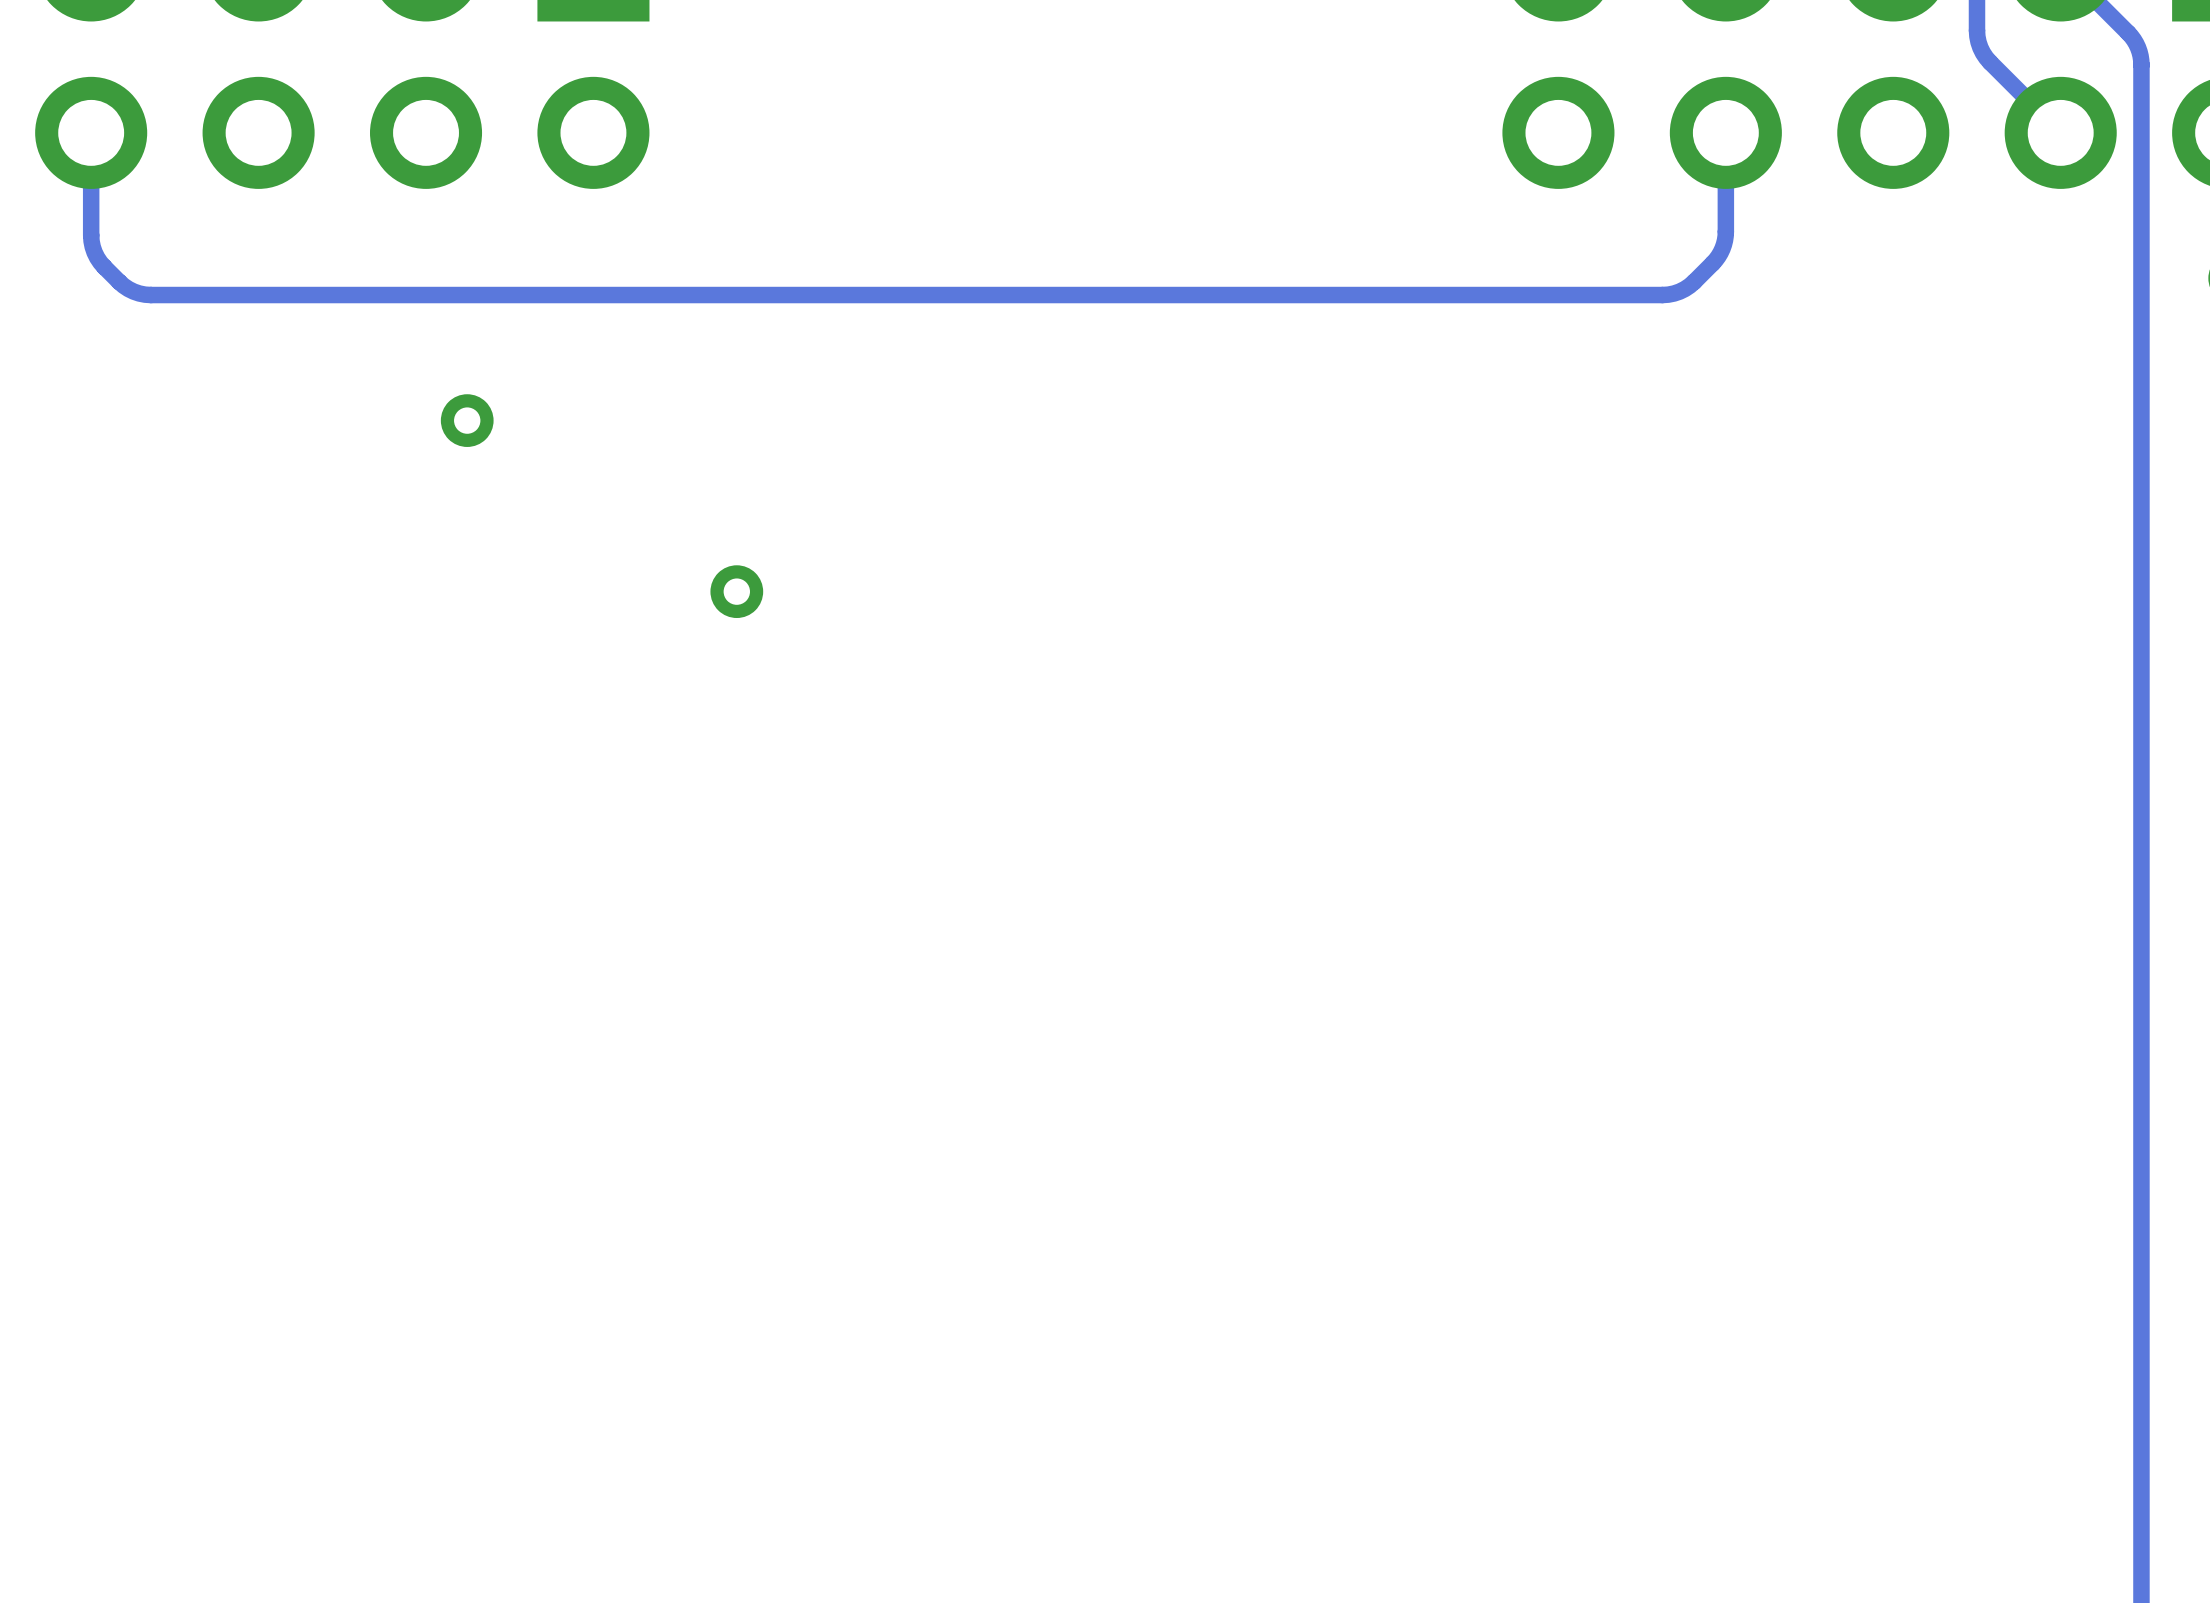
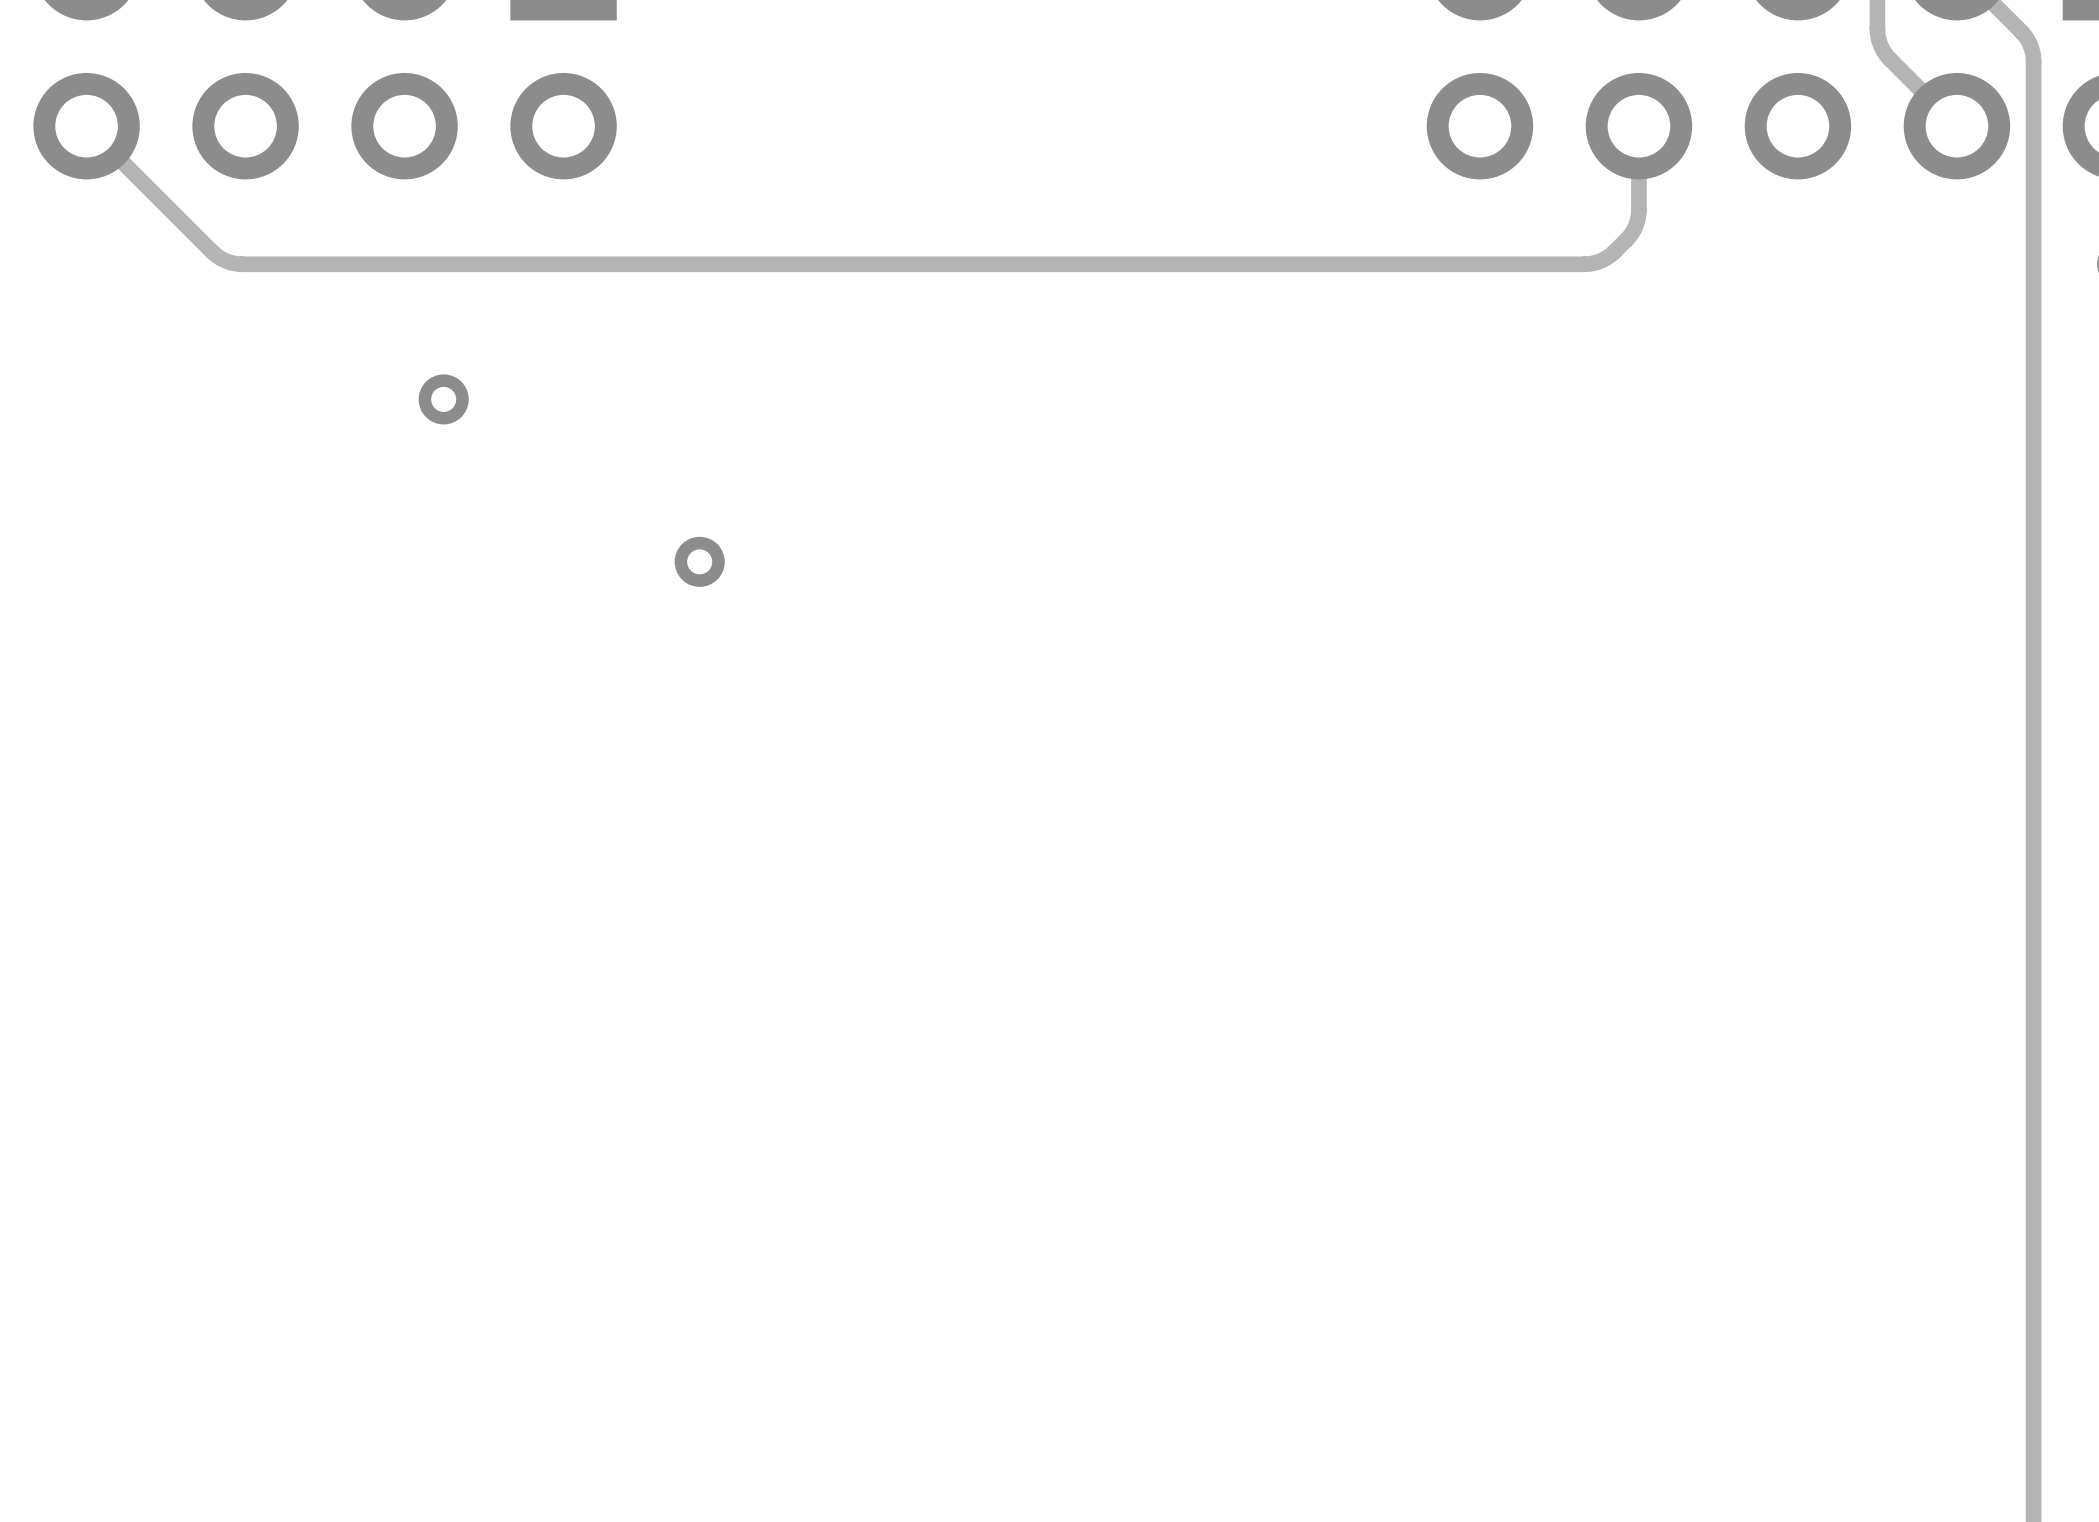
track: (91, 132) (91, 235) (94, 252) (100, 262) (123, 285) (139, 293) (150, 295) (1662, 295) (1674, 293) (1684, 289) (1715, 260) (1723, 244) (1725, 220) -> (86, 126) (212, 251) (226, 261) (242, 264) (1584, 264) (1605, 258) (1626, 239) (1635, 226) (1638, 209)

